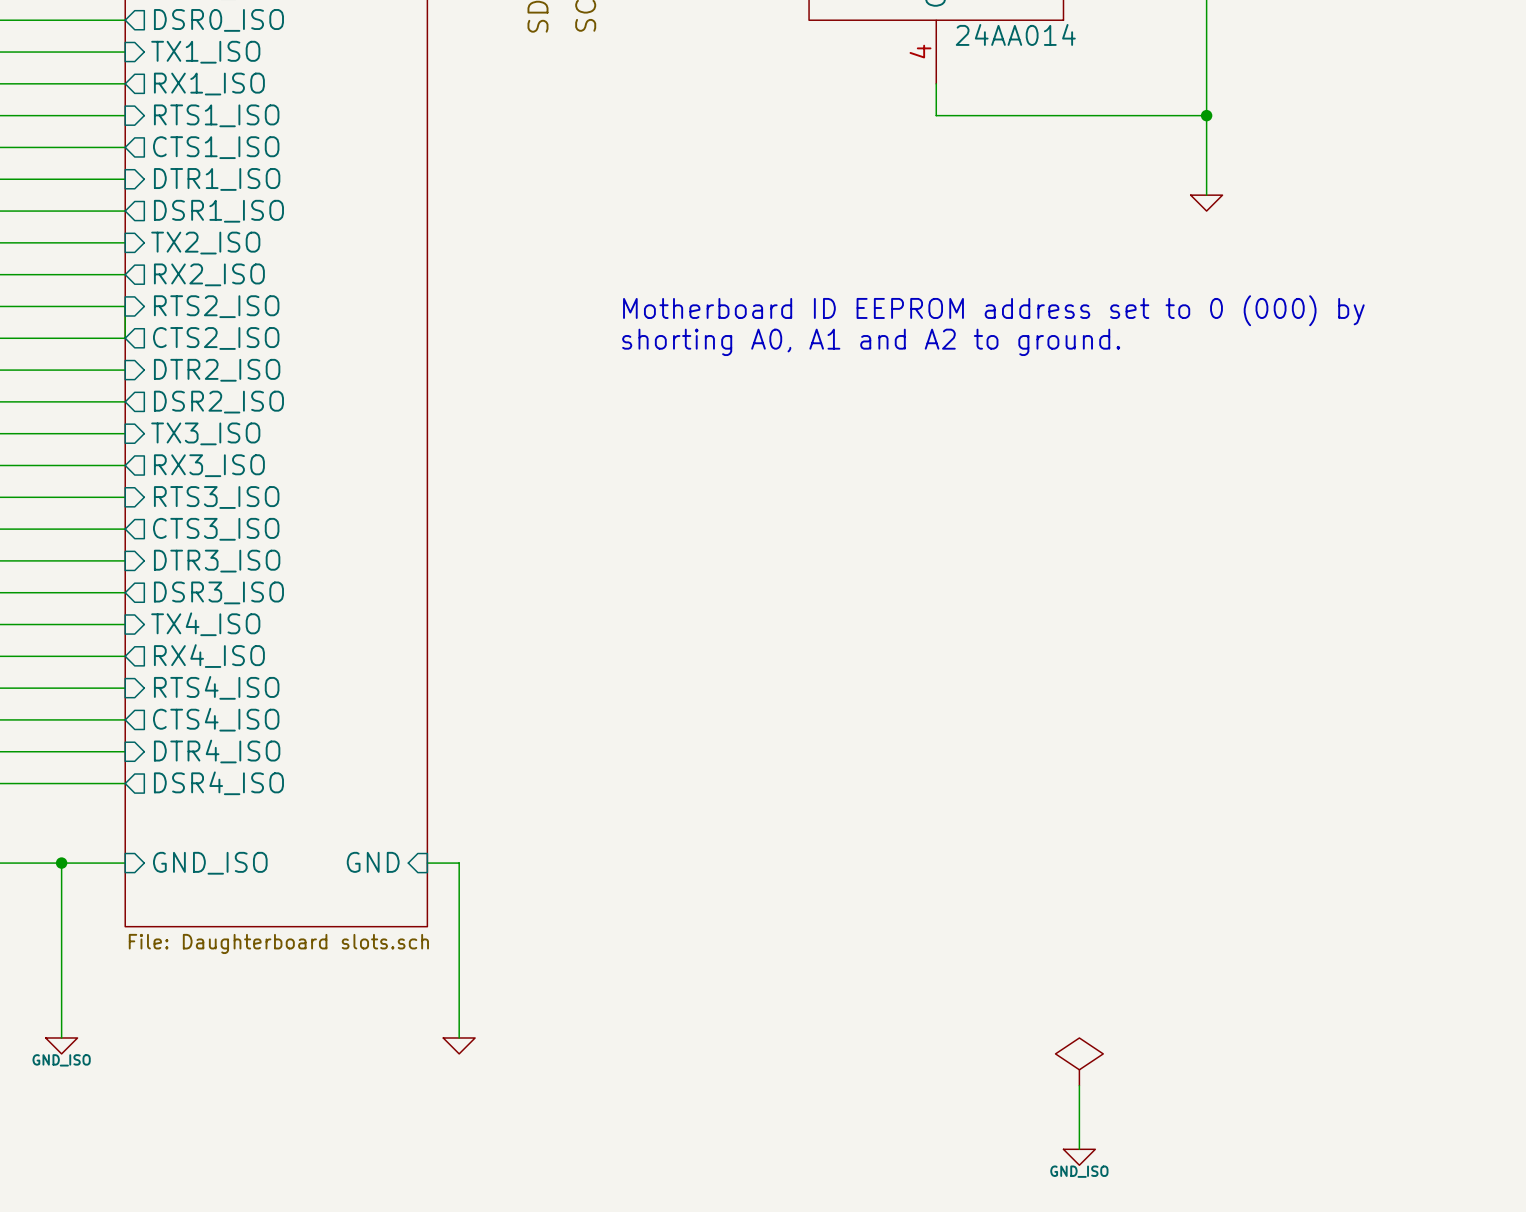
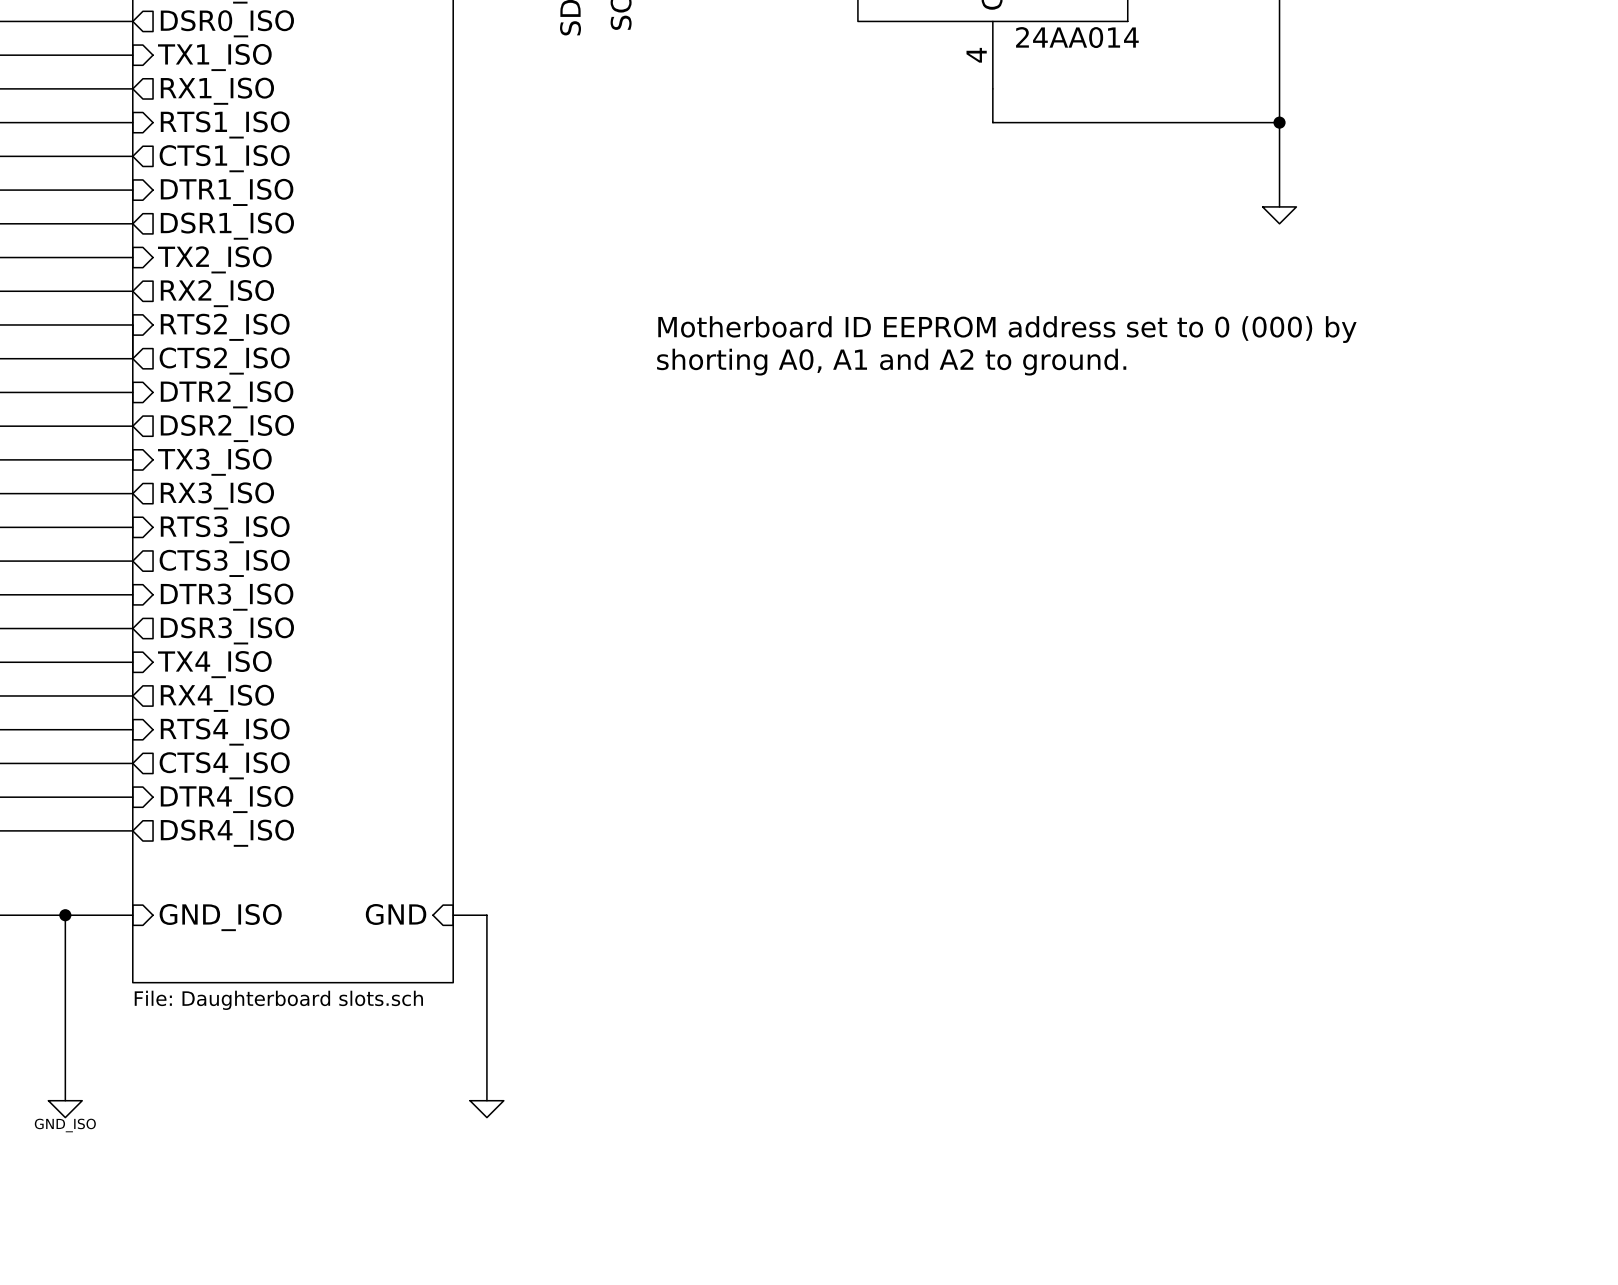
power symbol: (1079, 1061) -> none
wire: (1079, 1085) (1079, 1149) -> none
power symbol: GND_ISO (1079, 1157) -> none

